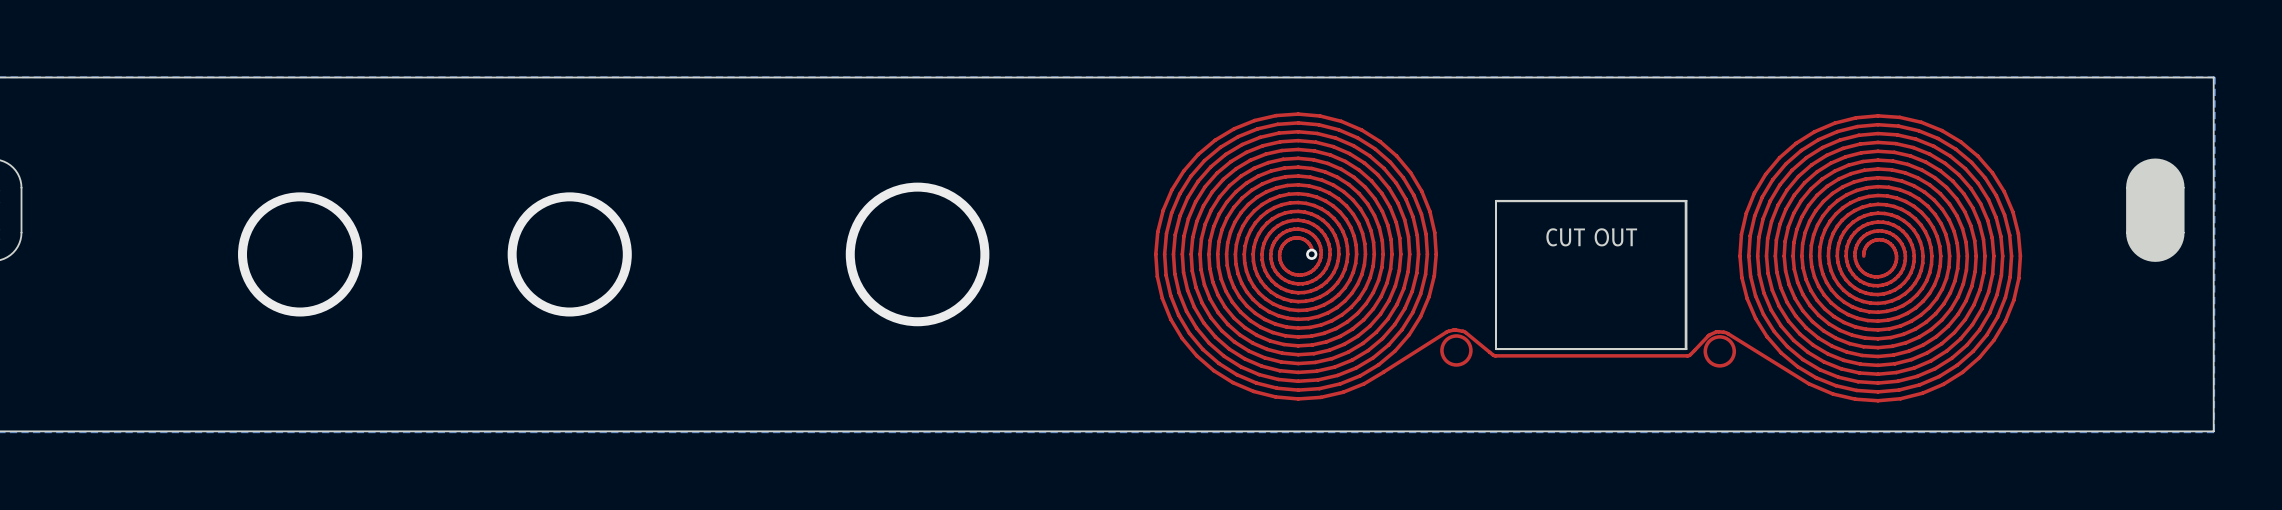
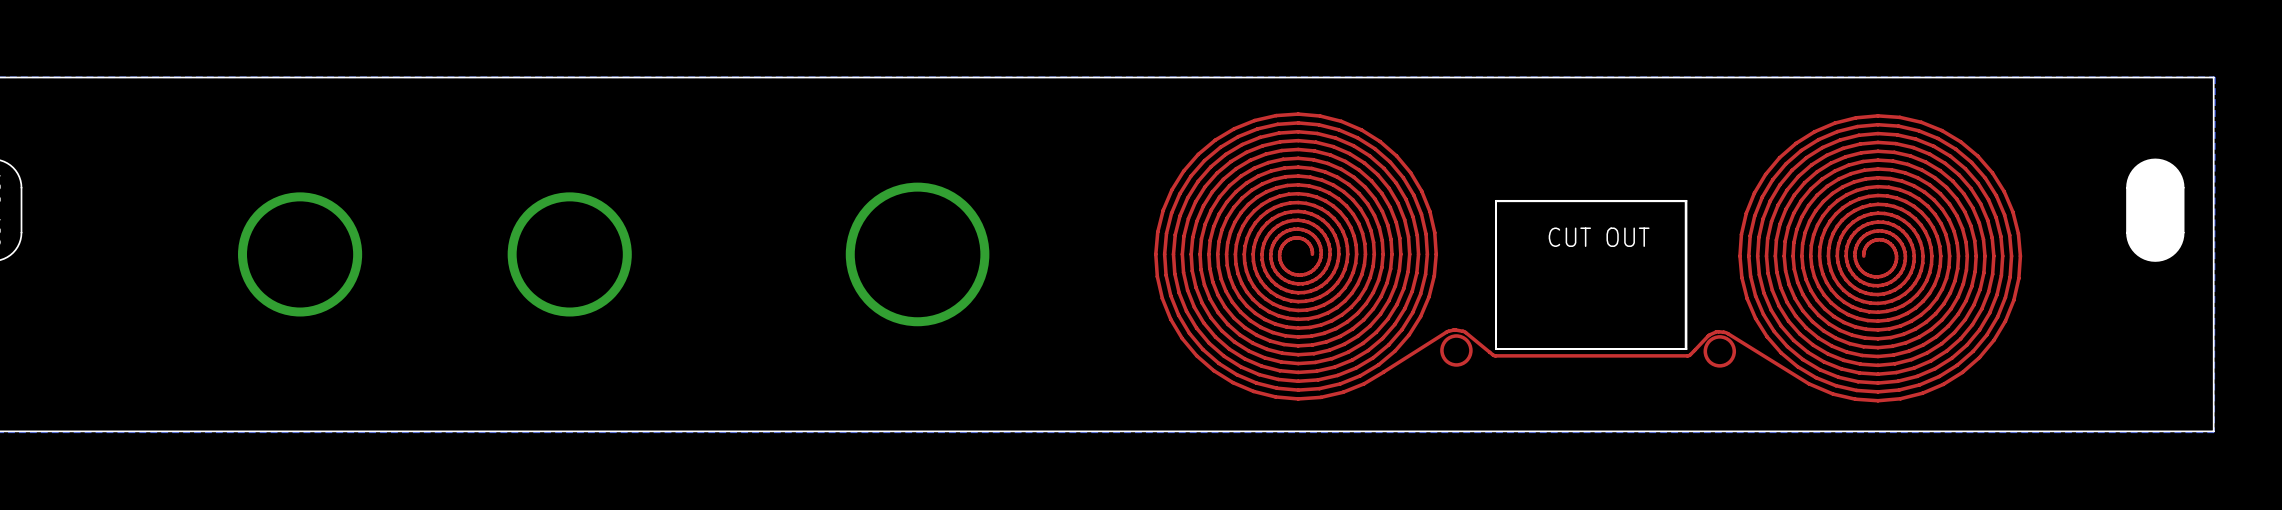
via: (1311, 254) -> none

